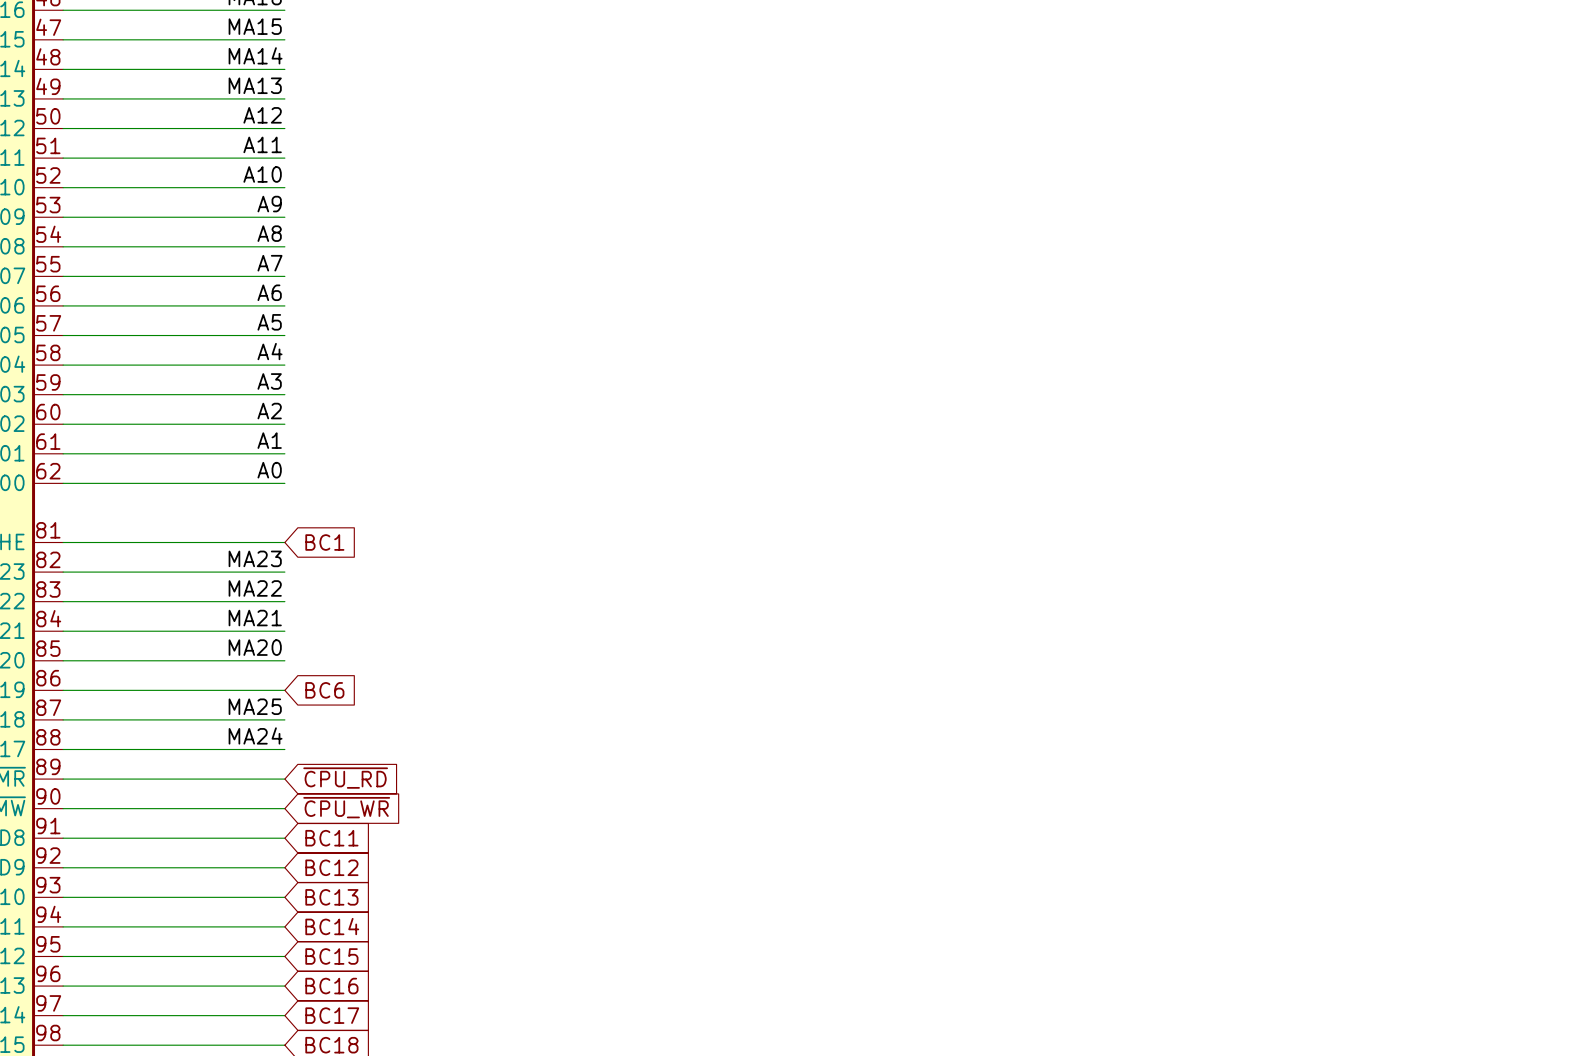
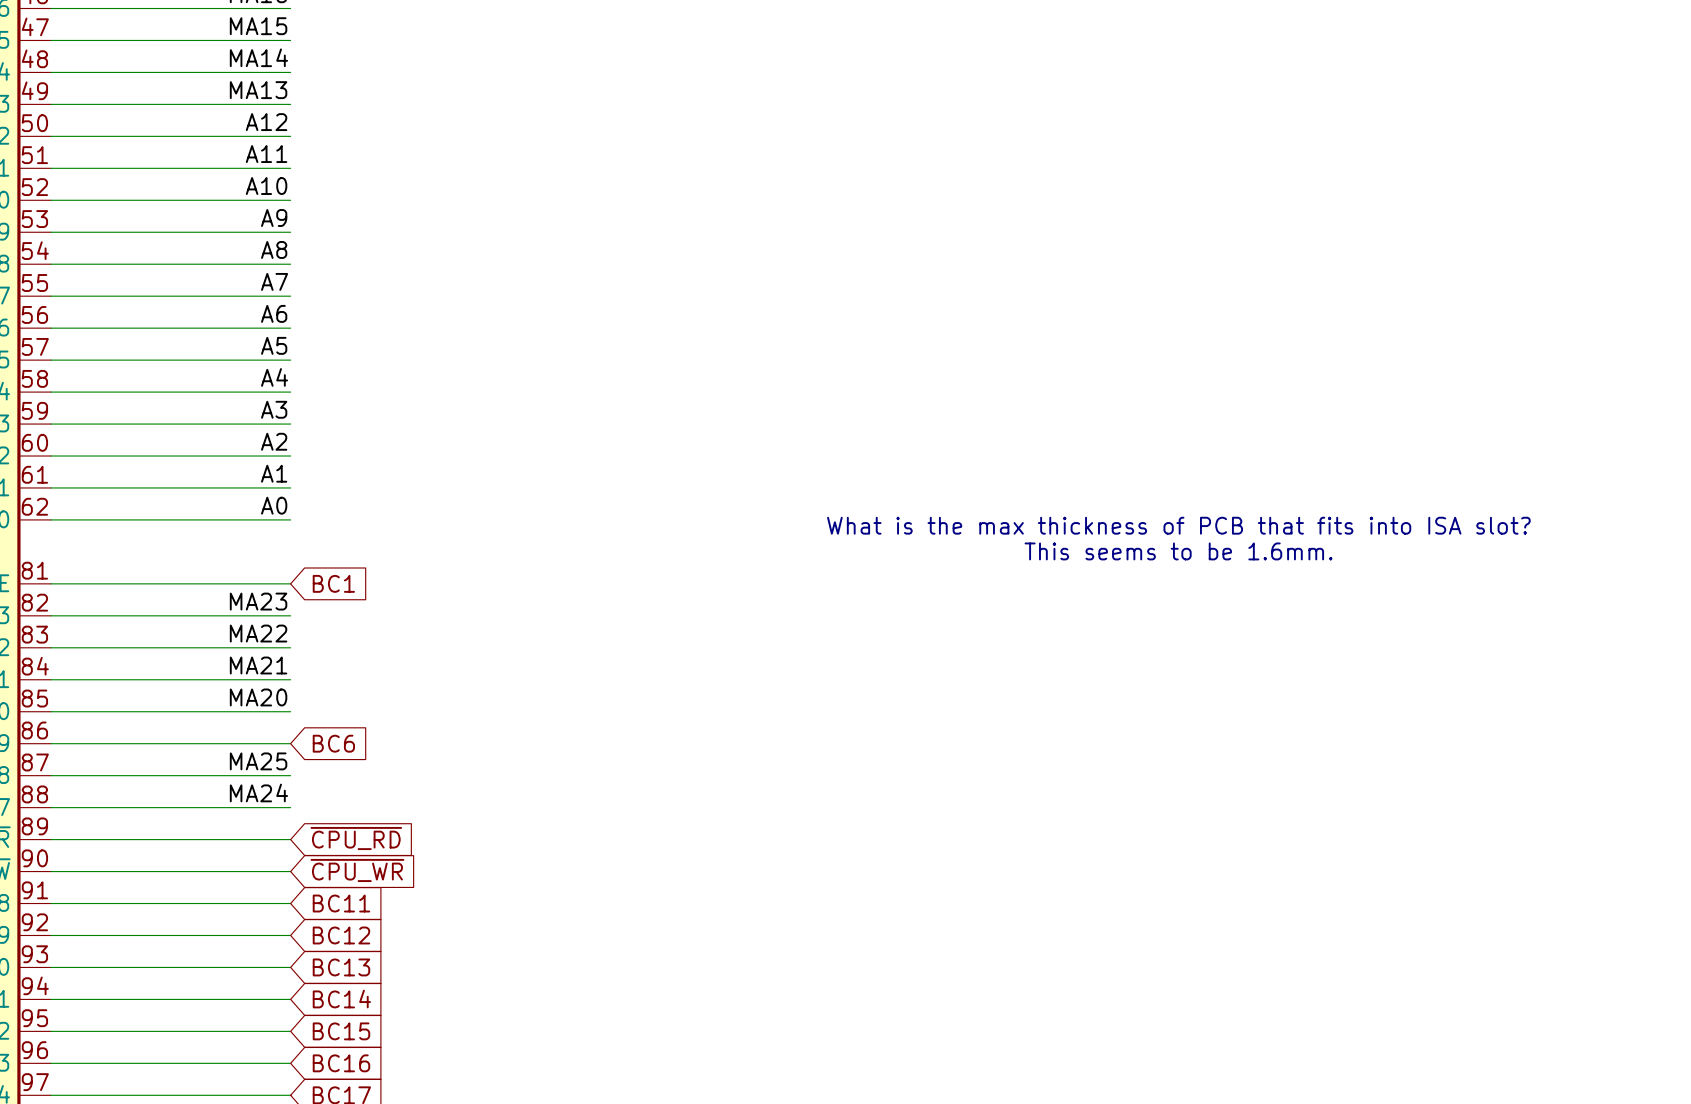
text: none -> What is the max thickness of PCB that fits into ISA slot? (1178, 525)
text: none -> This seems to be 1.6mm. (1178, 551)

